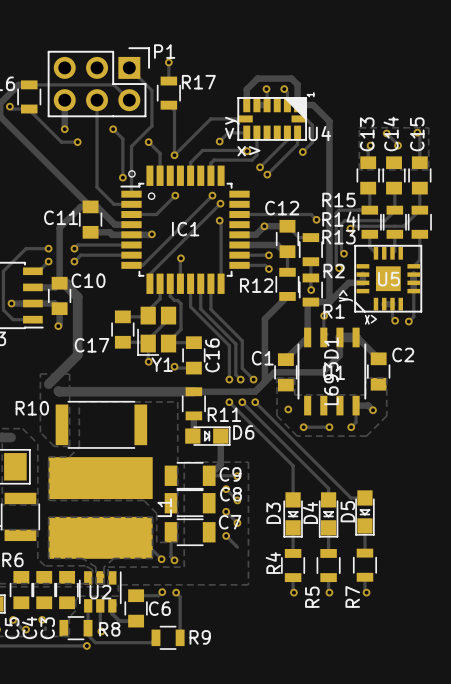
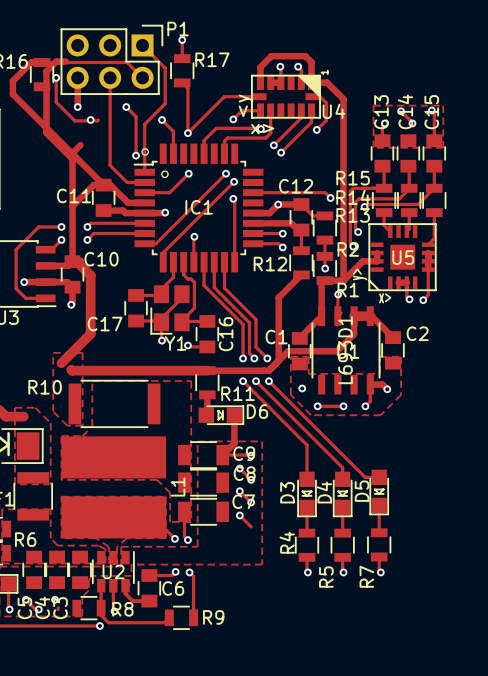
track: none -> (65, 61) (56, 61) (46, 71) (46, 132) (72, 159)
track: none -> (56, 77) (56, 102) (74, 120) (98, 120)
track: (9, 106) (12, 109) (29, 109) (61, 142) (77, 142) -> none
via position: (9, 106) -> (56, 77)
track: none -> (80, 145) (72, 153) (72, 206)

